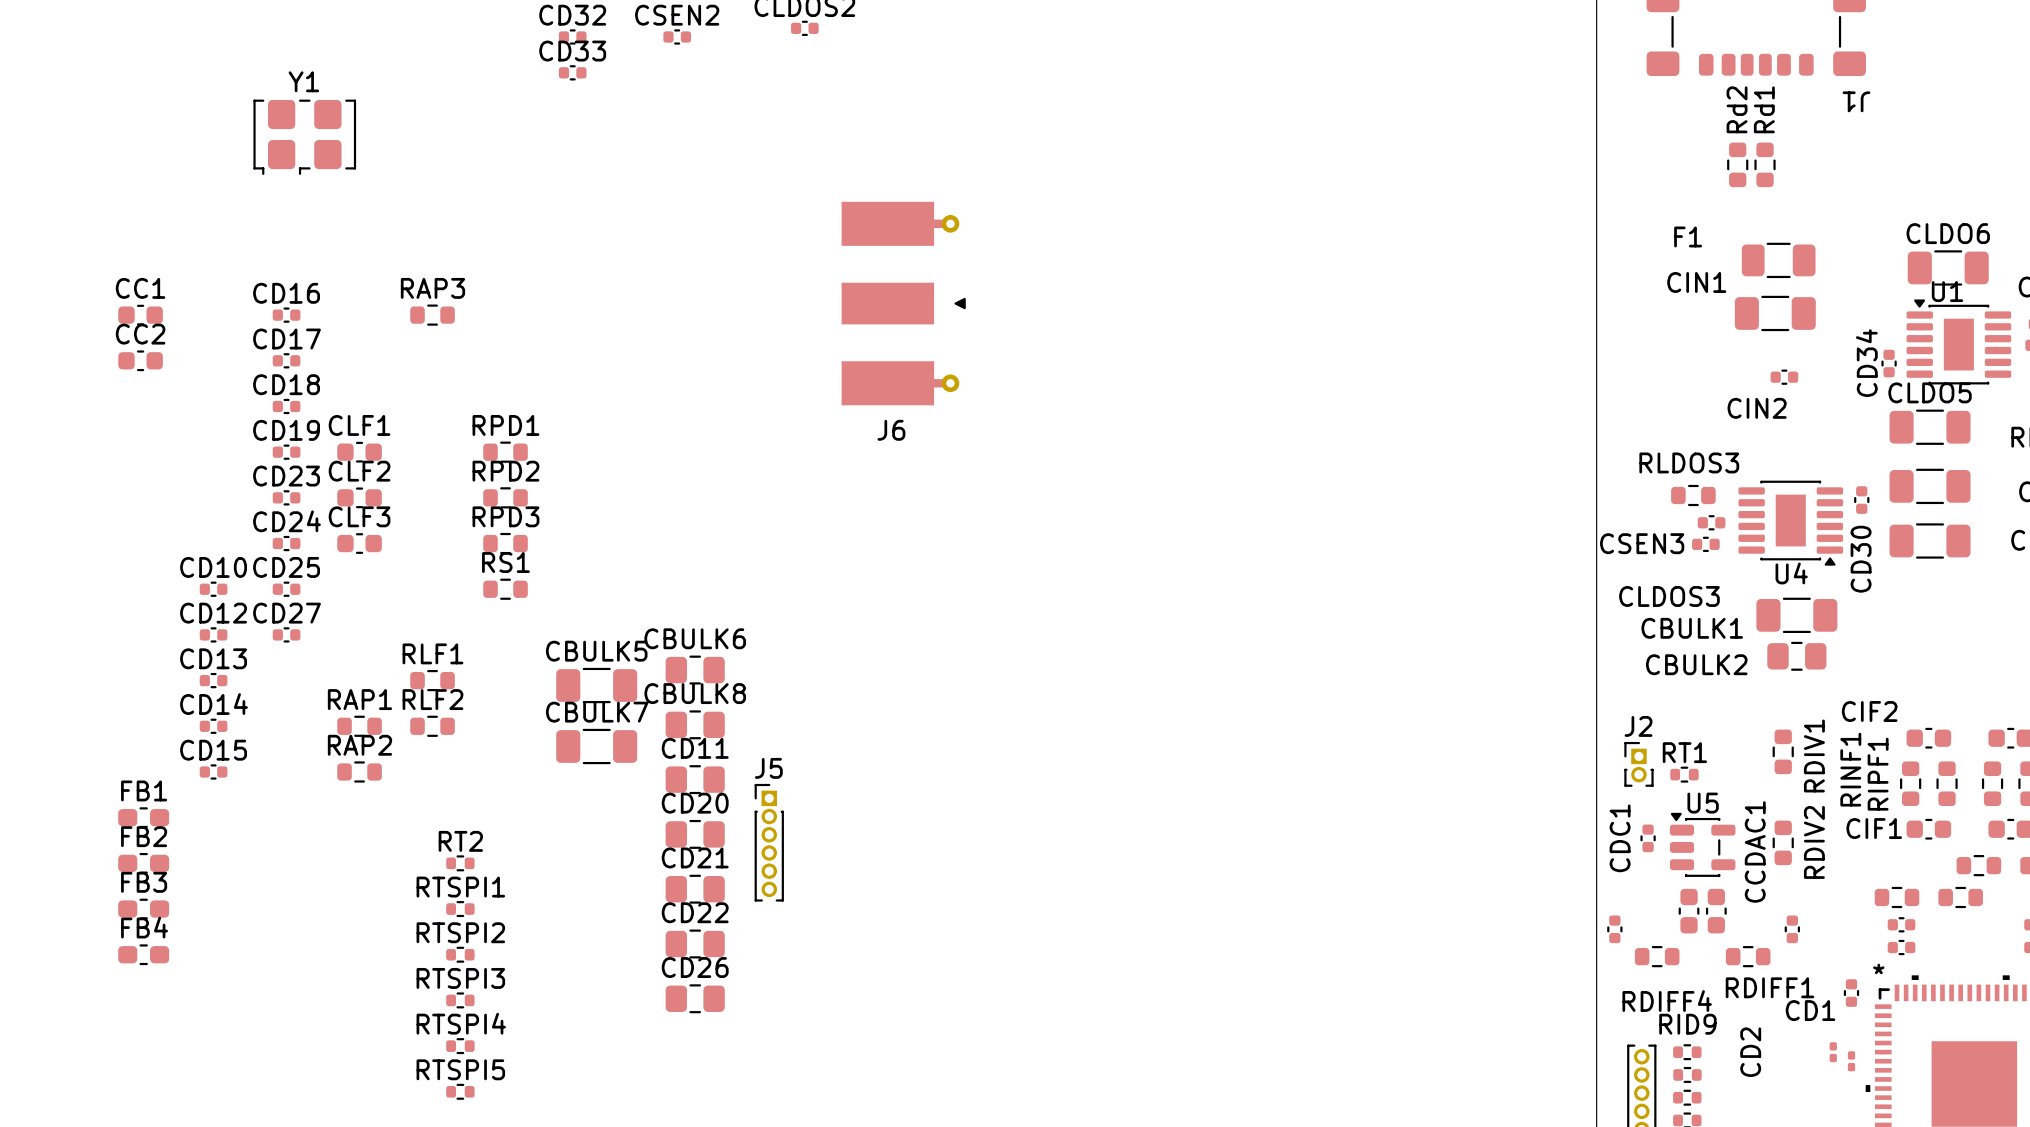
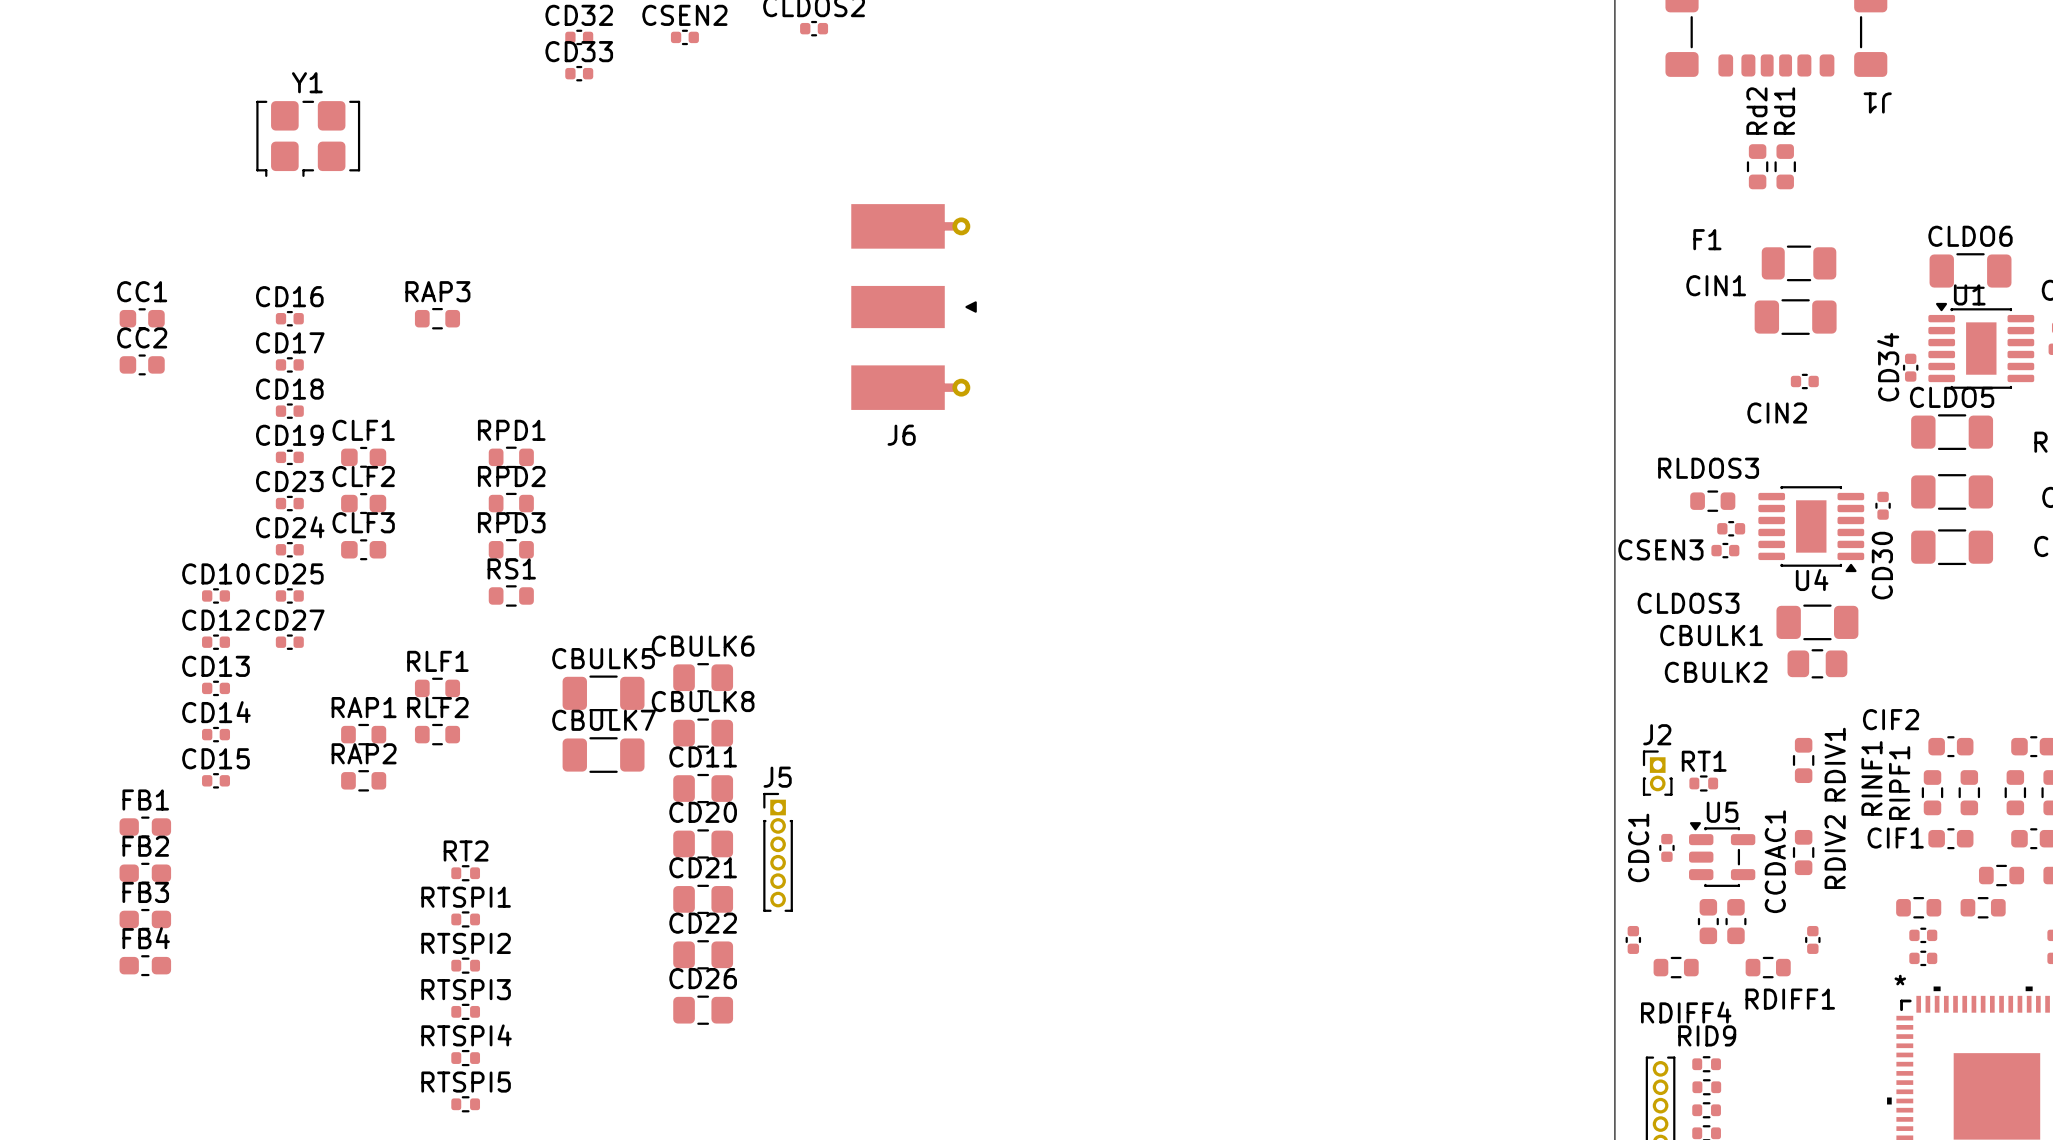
CD1: (1851, 993) -> none
CD2: (1833, 1052) -> none
part: (1851, 1061) -> none

